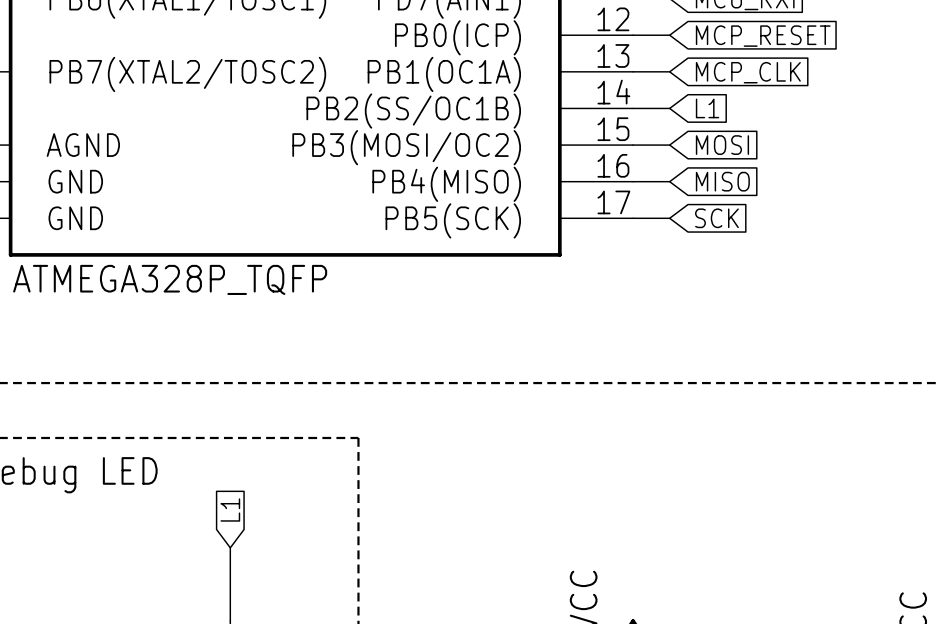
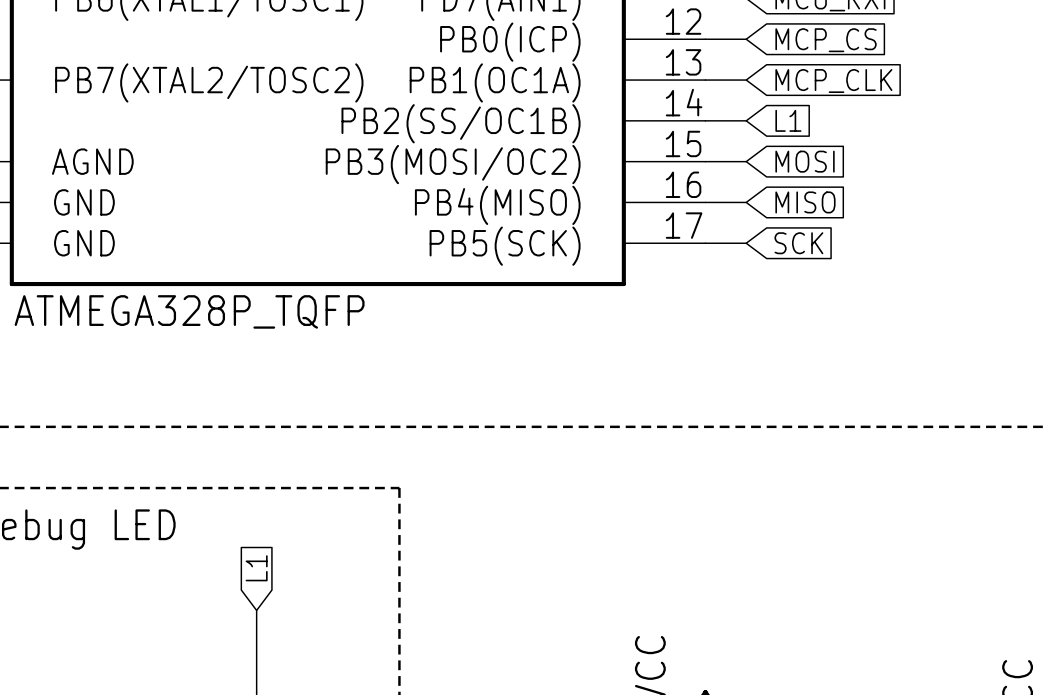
global label: MCP_RESET (763, 36) -> MCP_CS (826, 40)

